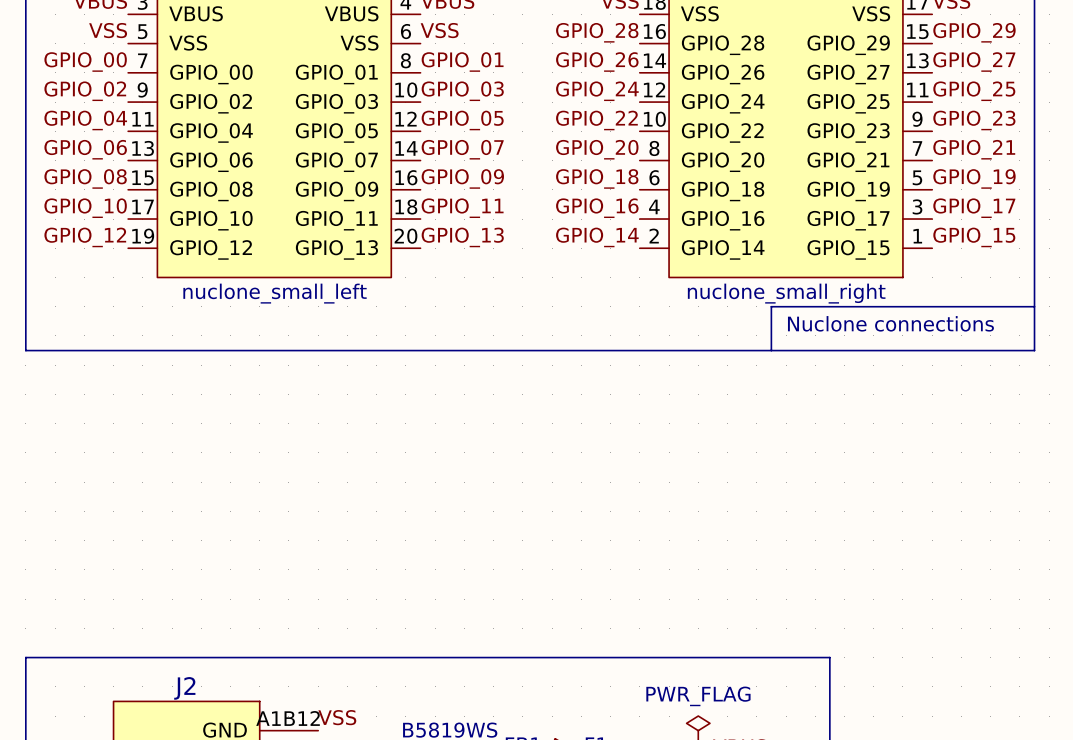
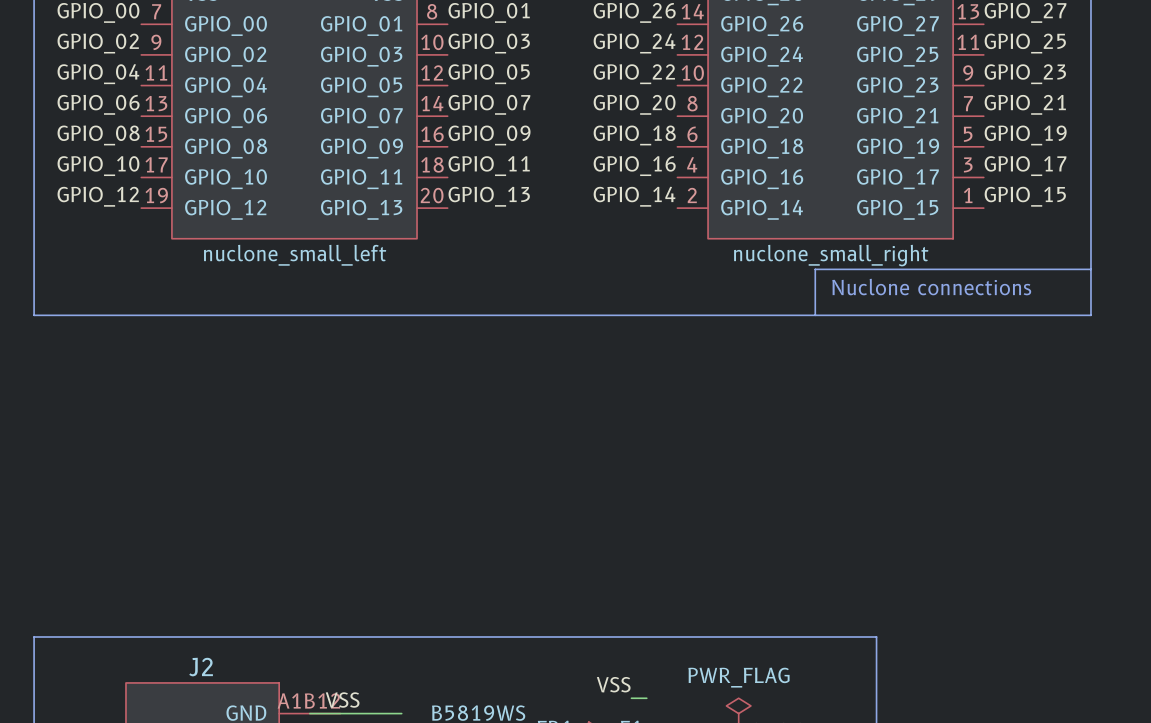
label: none -> VSS (613, 684)
wire: none -> (631, 698) (646, 698)
label position: VSS (337, 717) -> VSS (342, 700)
wire: none -> (309, 713) (401, 713)

